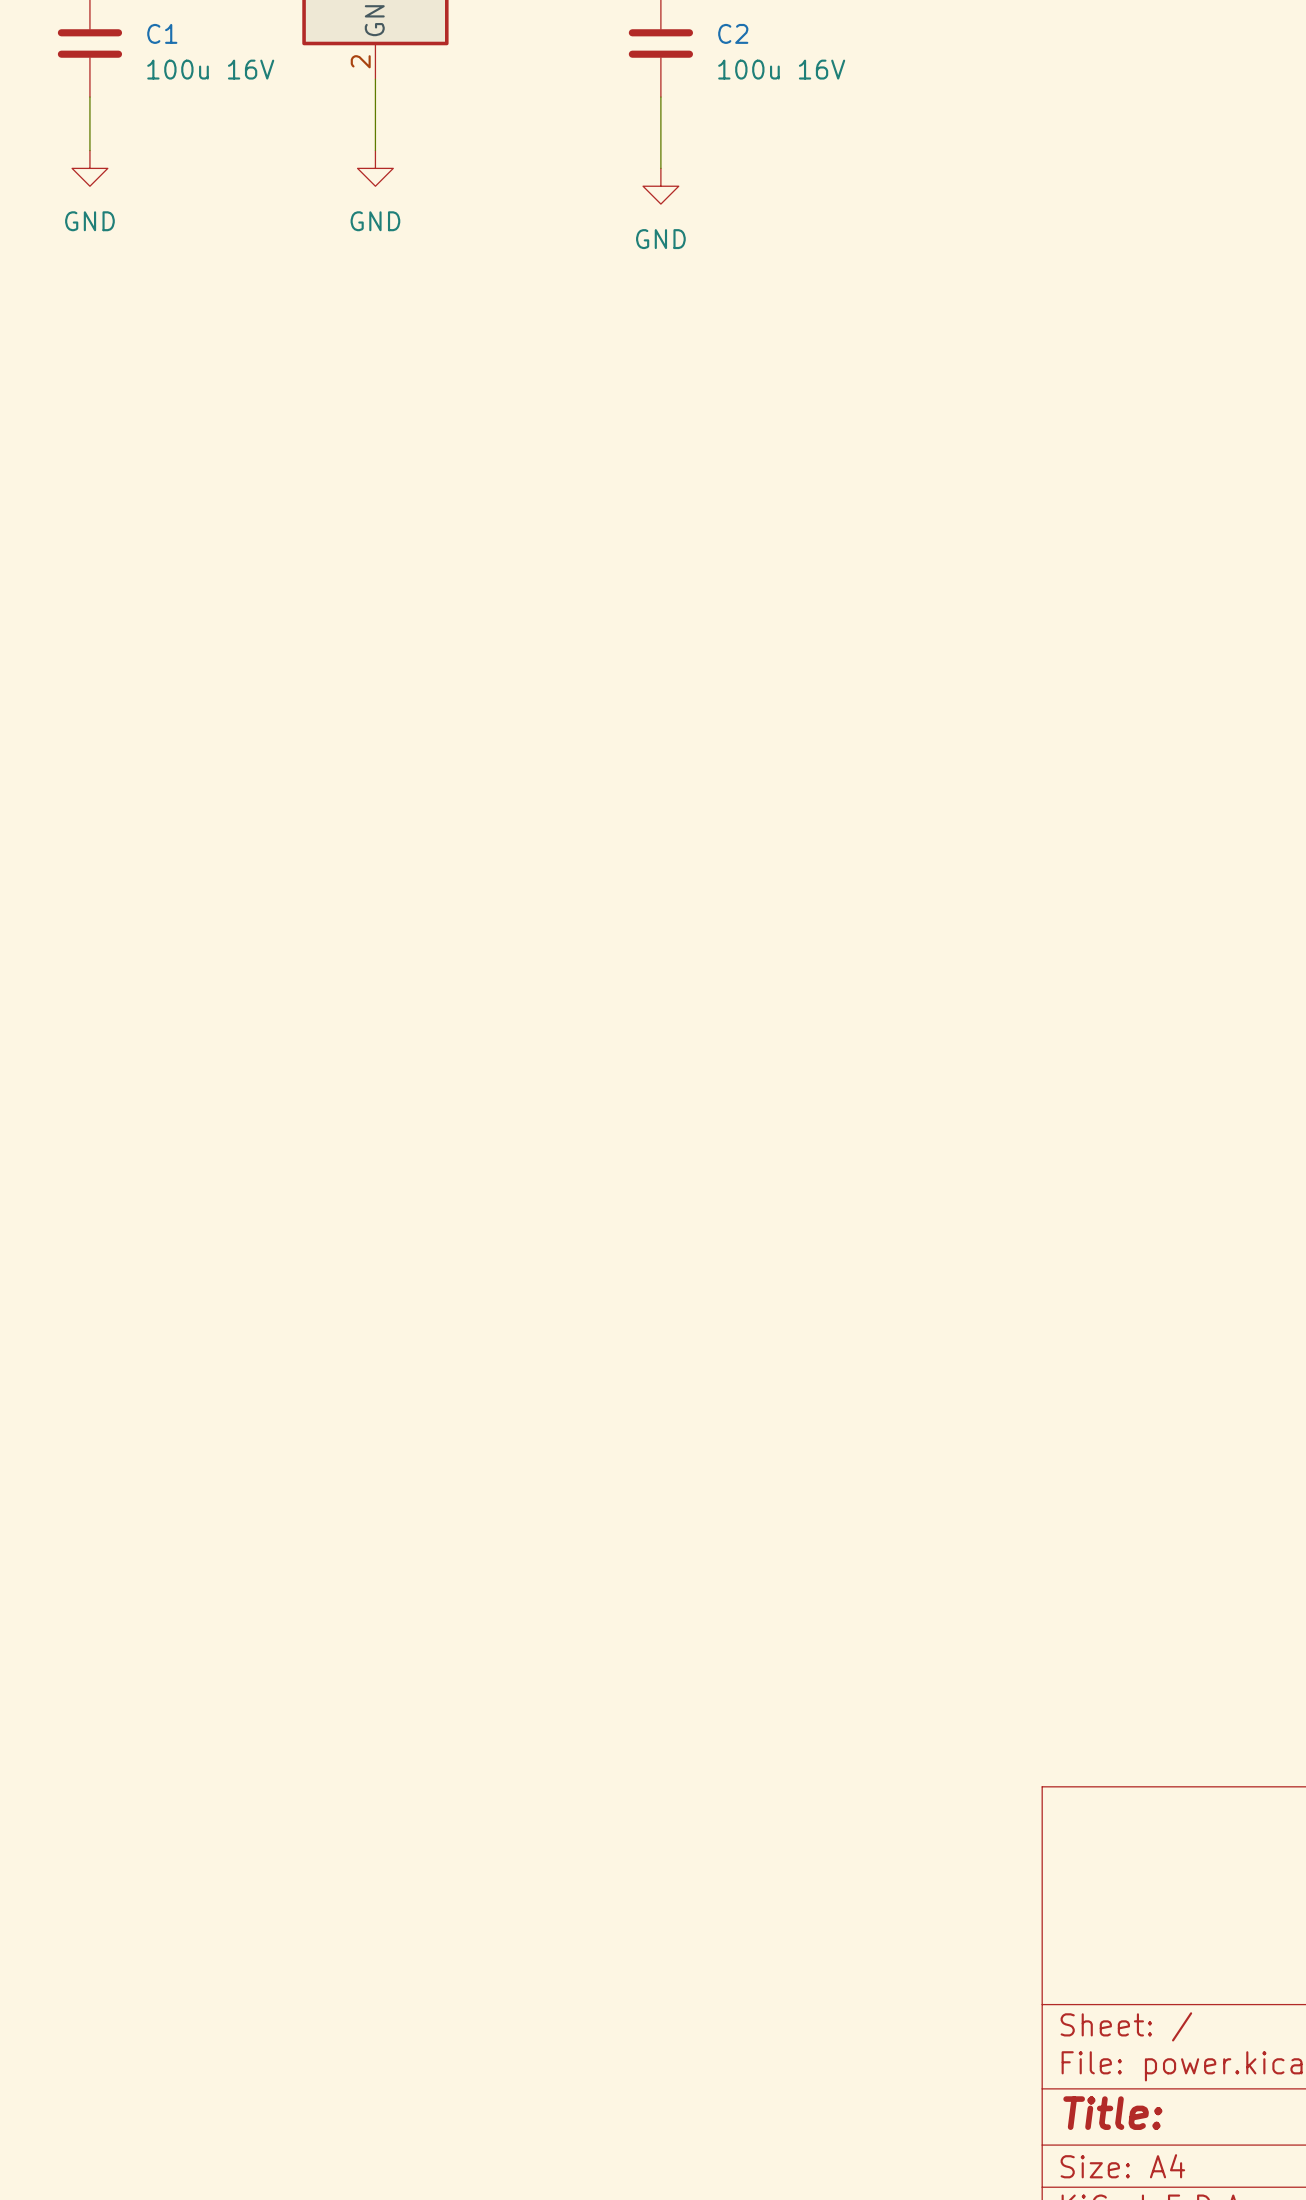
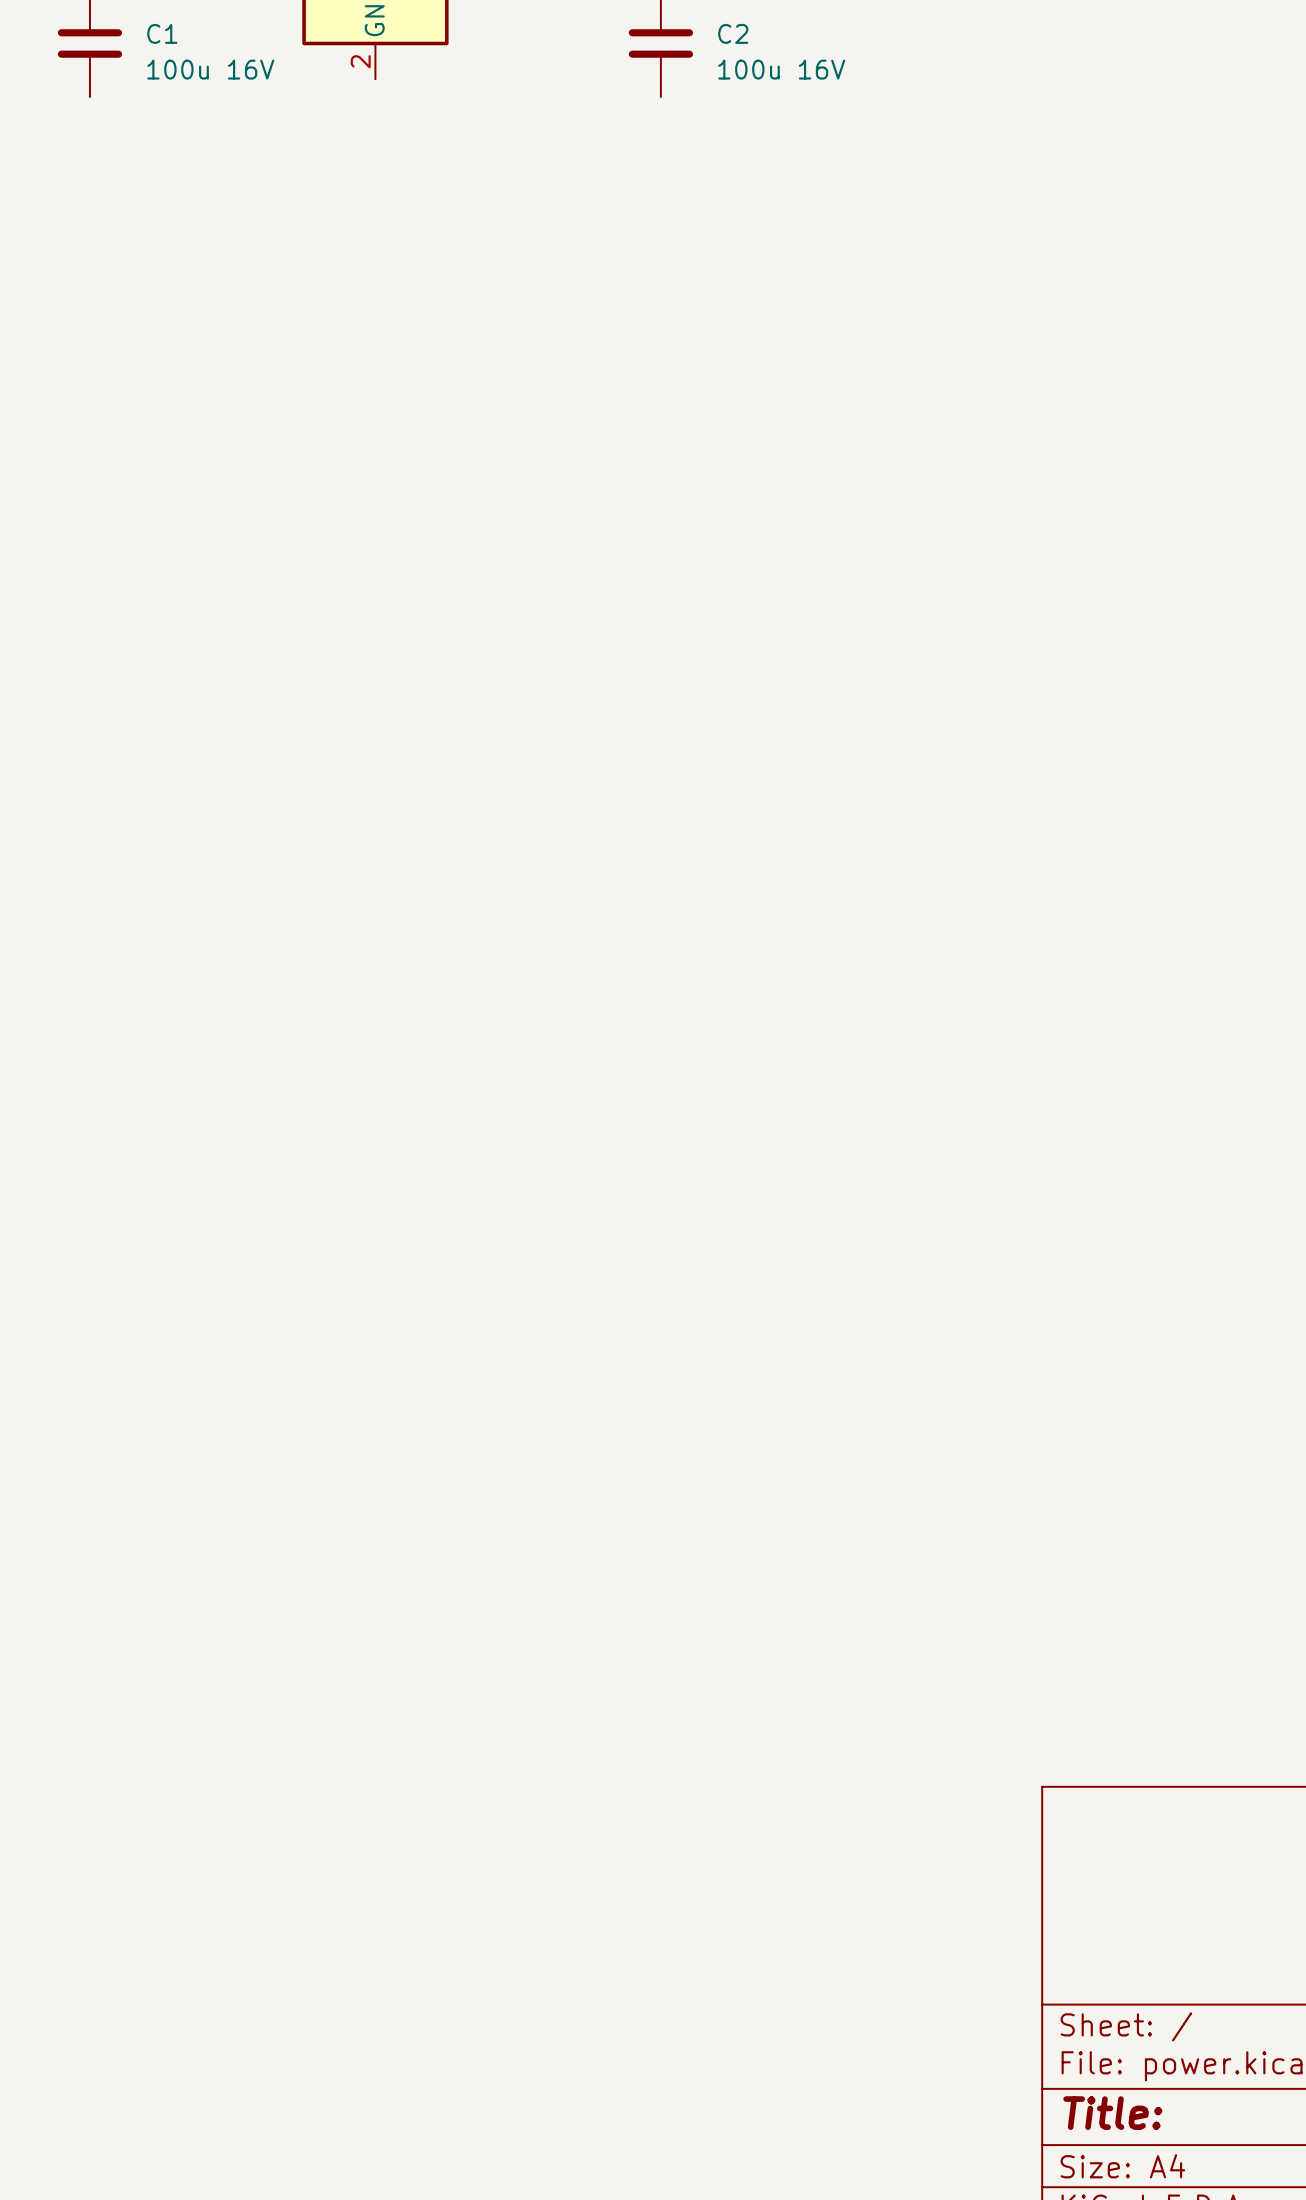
wire: (375, 79) (375, 150) -> none
wire: (89, 97) (89, 150) -> none
wire: (660, 97) (660, 168) -> none
power symbol: GND (89, 168) -> none
power symbol: GND (375, 168) -> none
power symbol: GND (660, 186) -> none

